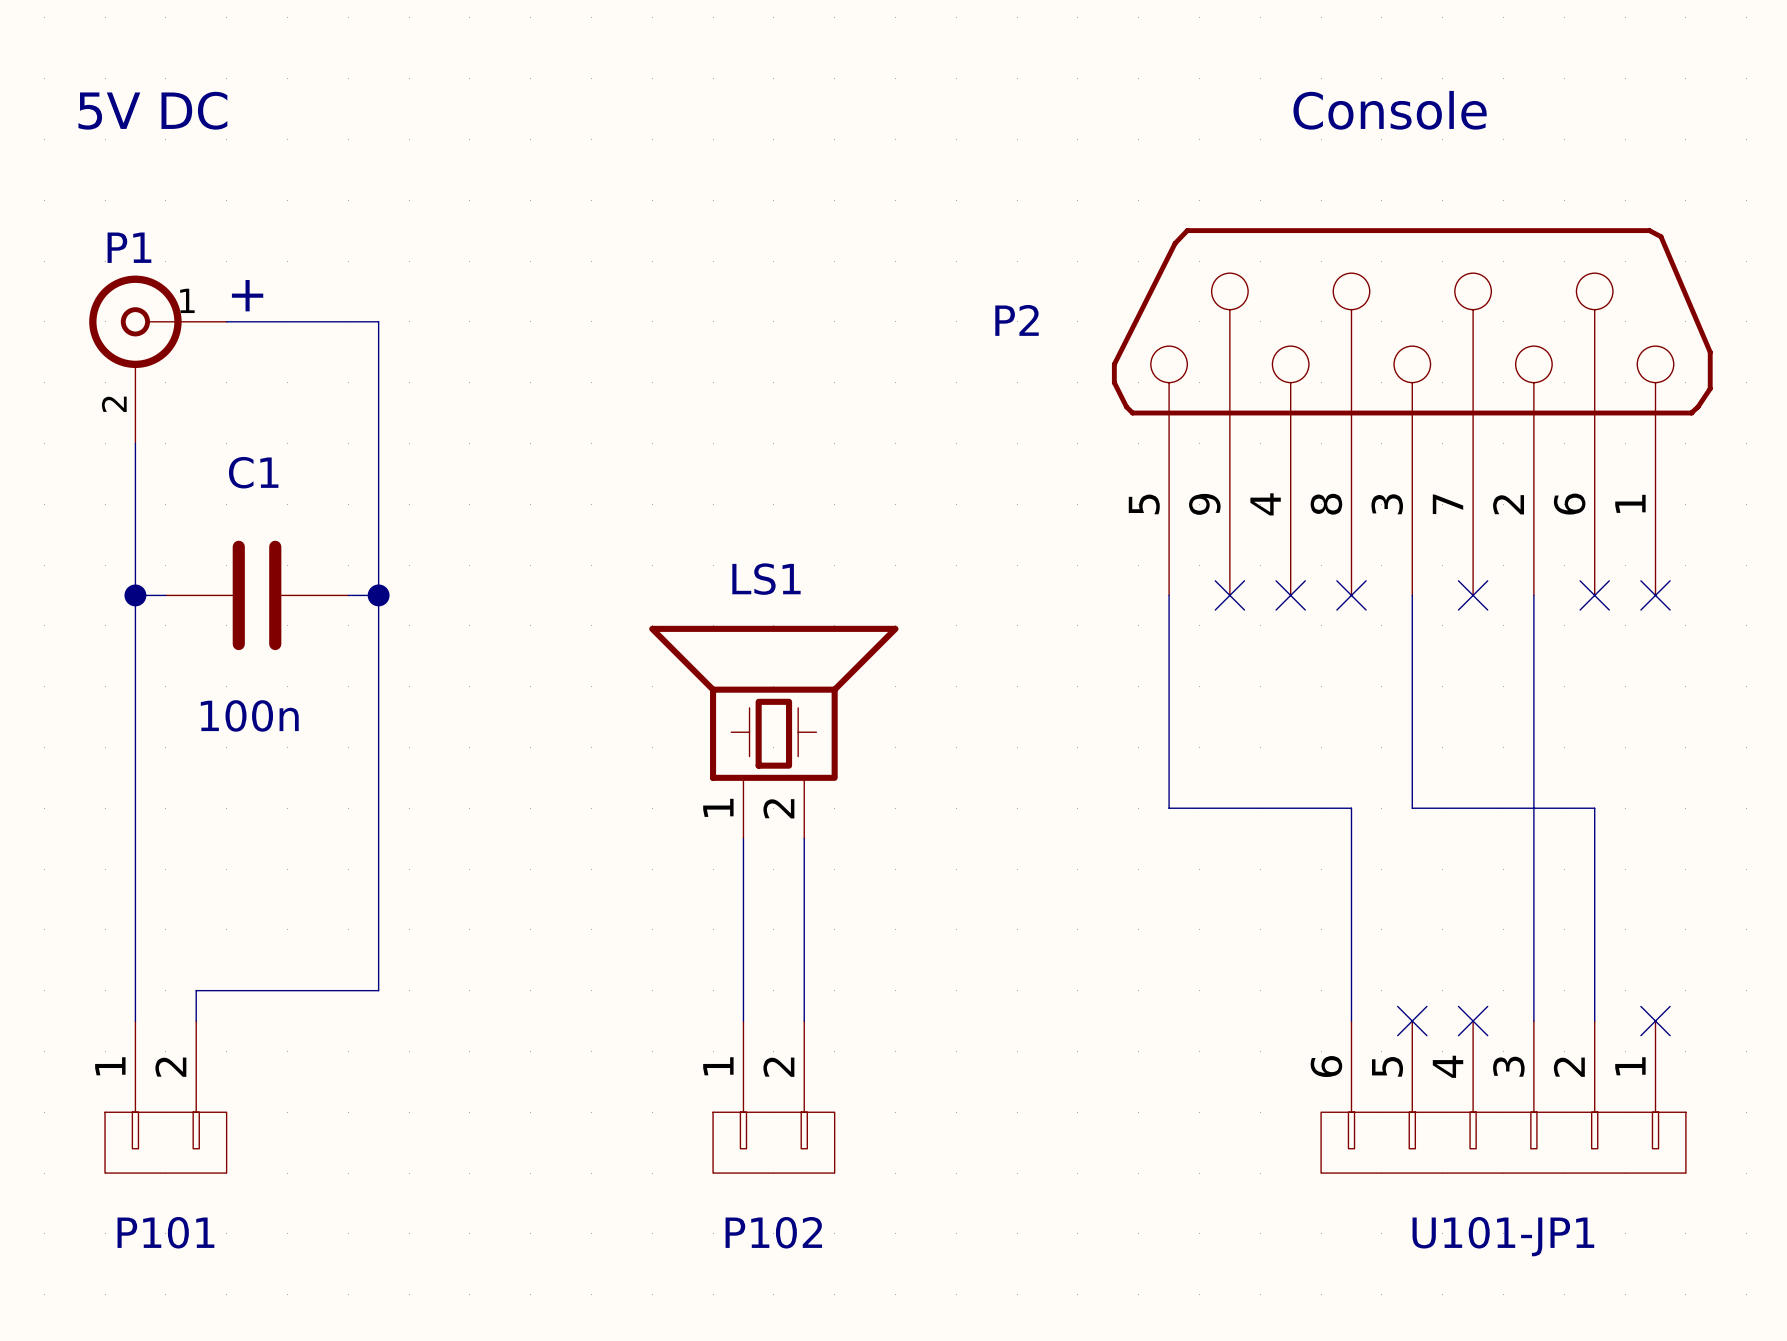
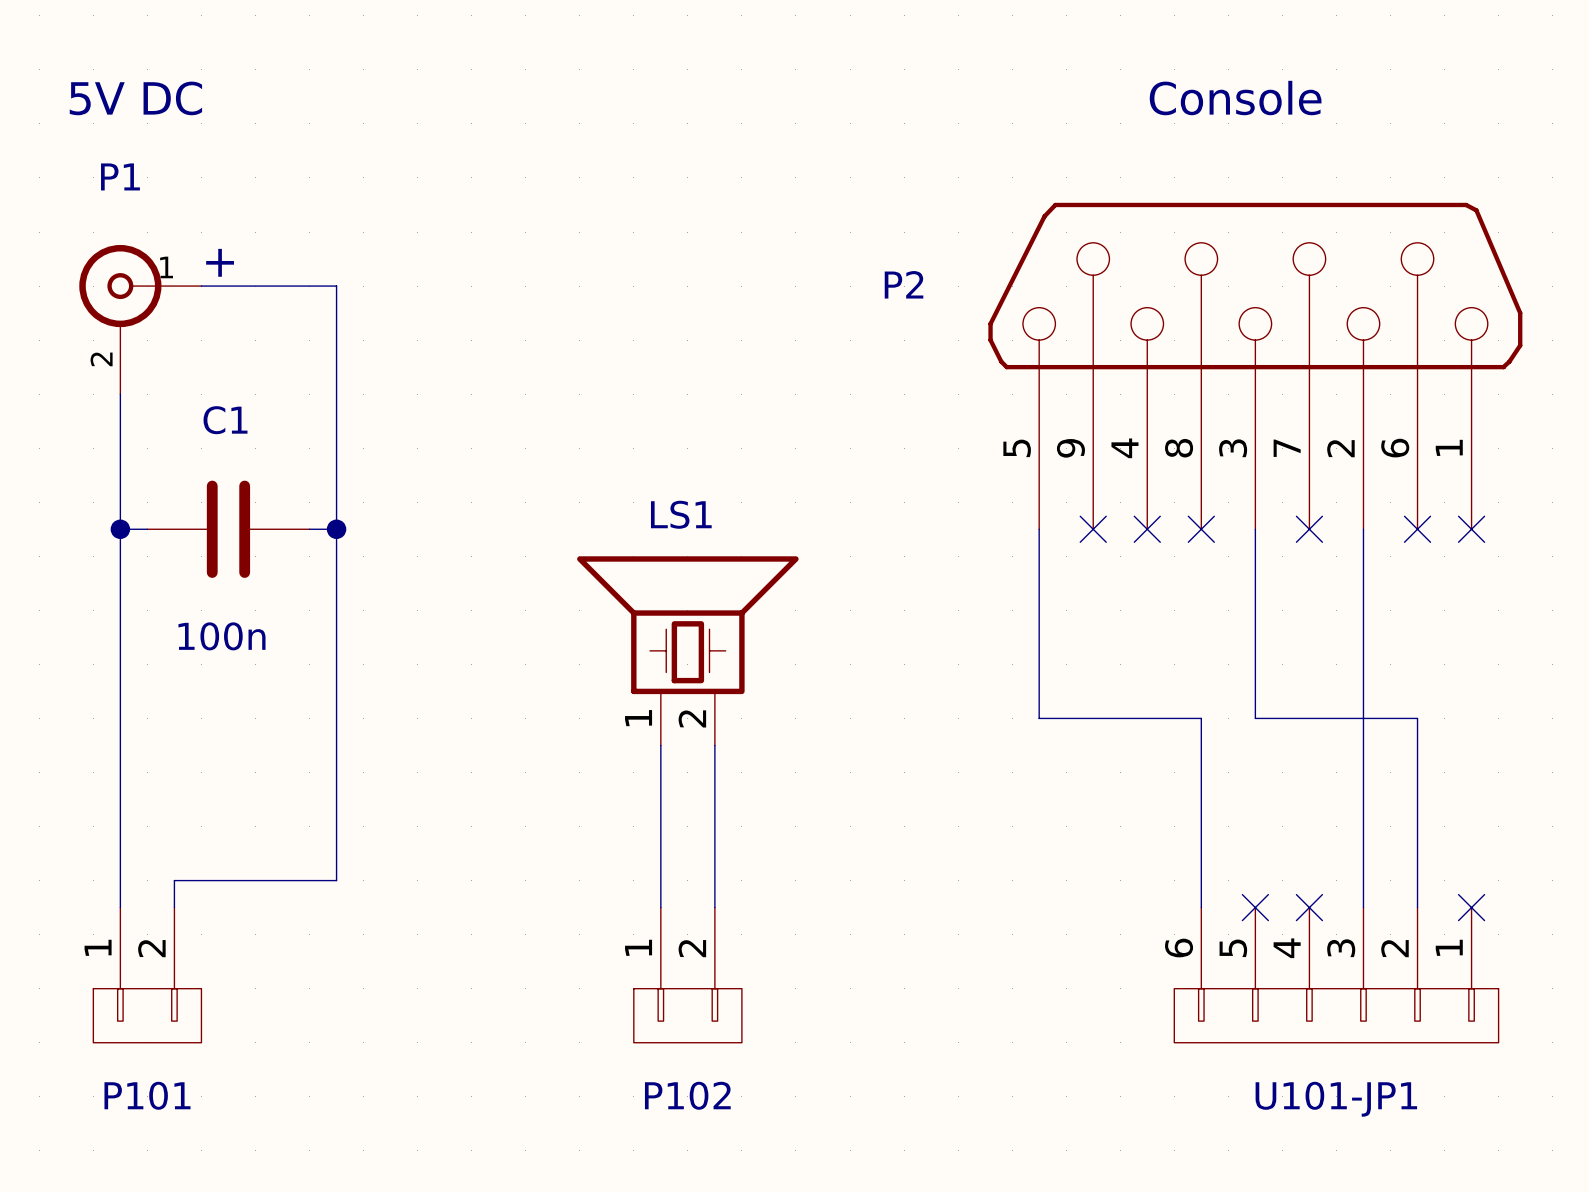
P1 name position: P1 (129, 247) -> P1 (120, 176)

